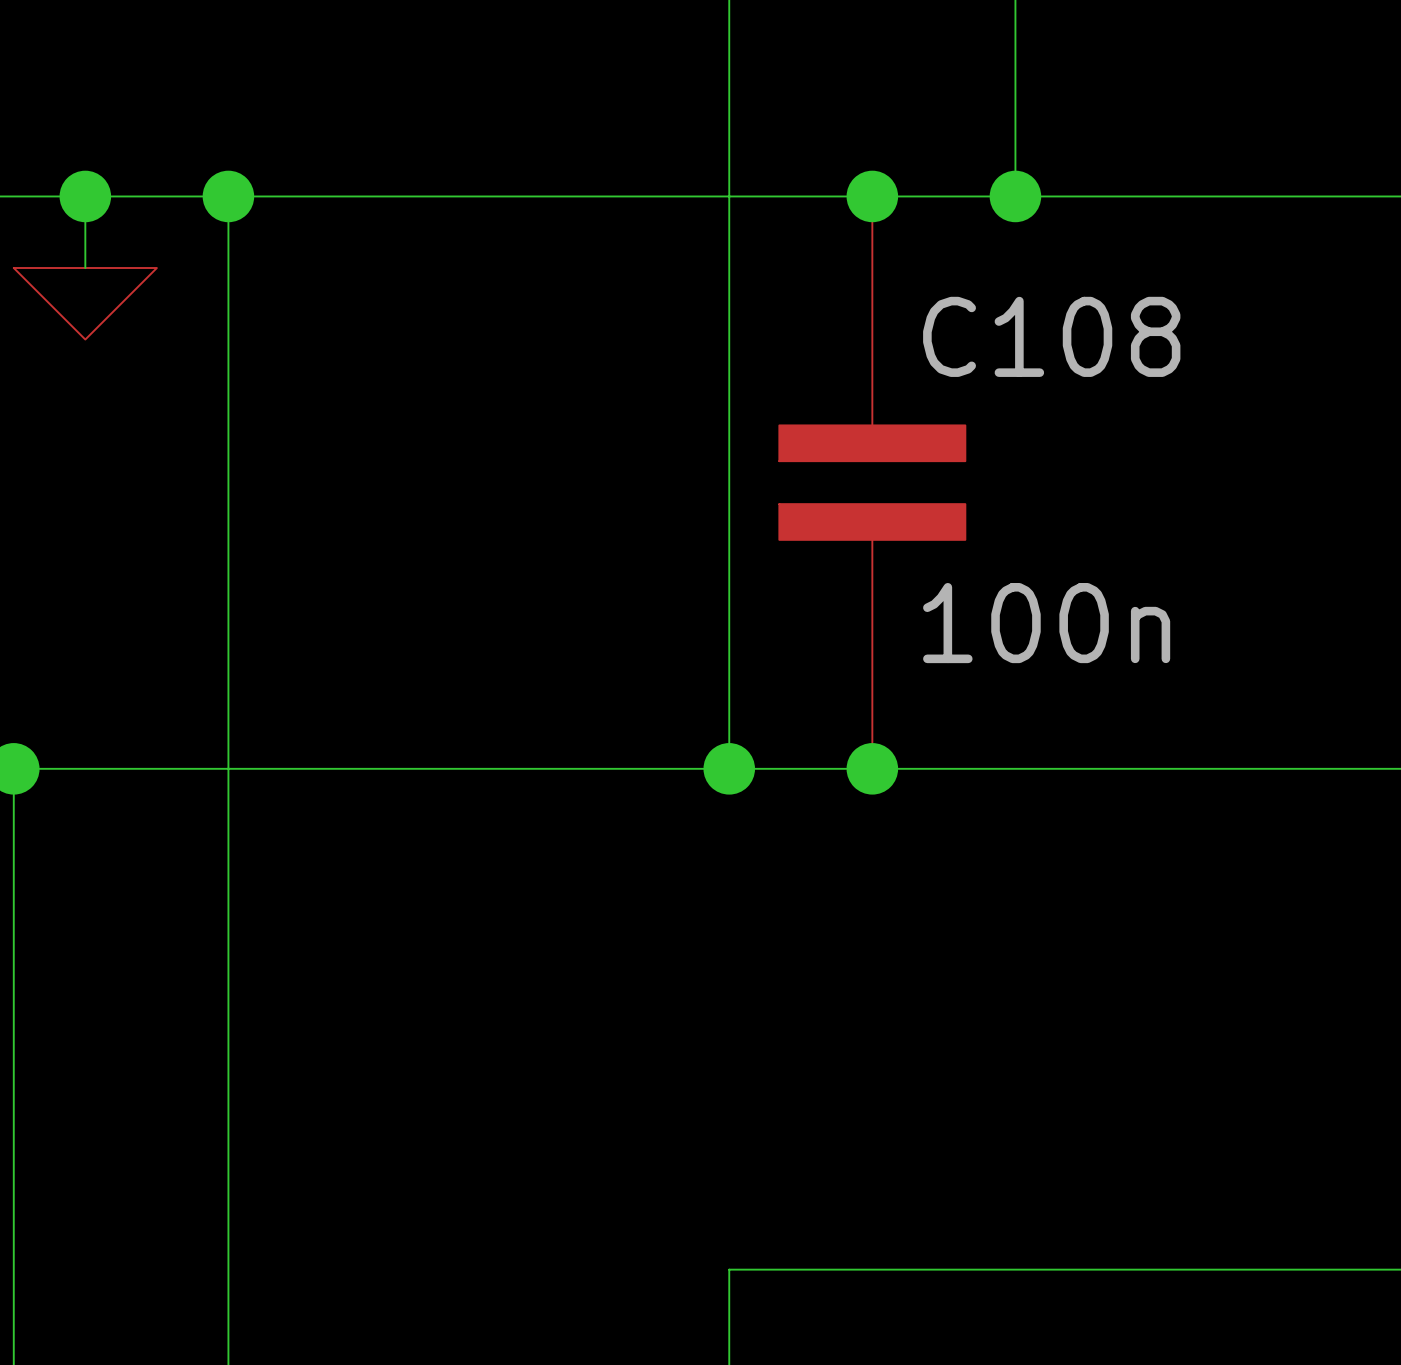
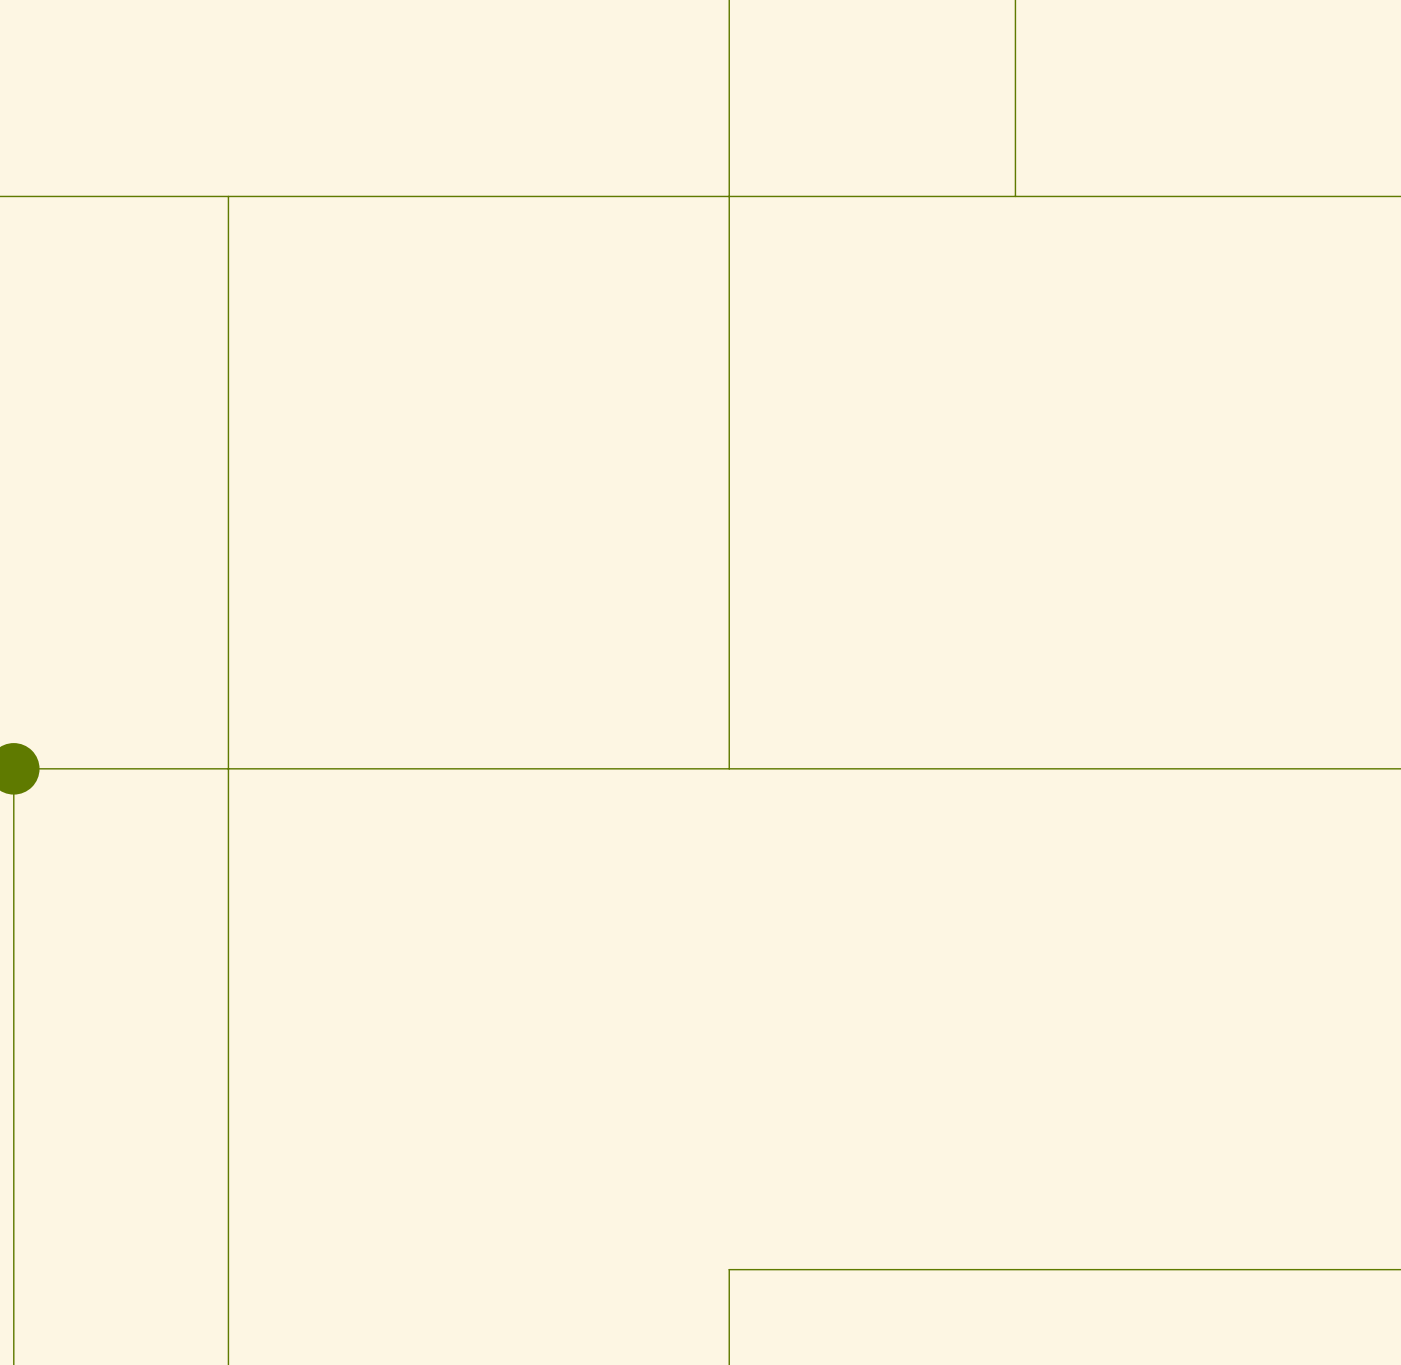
wire: (85, 196) (85, 268) -> none
junction: (85, 196) -> none
junction: (228, 196) -> none
junction: (872, 196) -> none
junction: (1015, 196) -> none
power symbol: (85, 303) -> none
C108: 100n (872, 482) -> none
junction: (729, 768) -> none
junction: (872, 768) -> none

